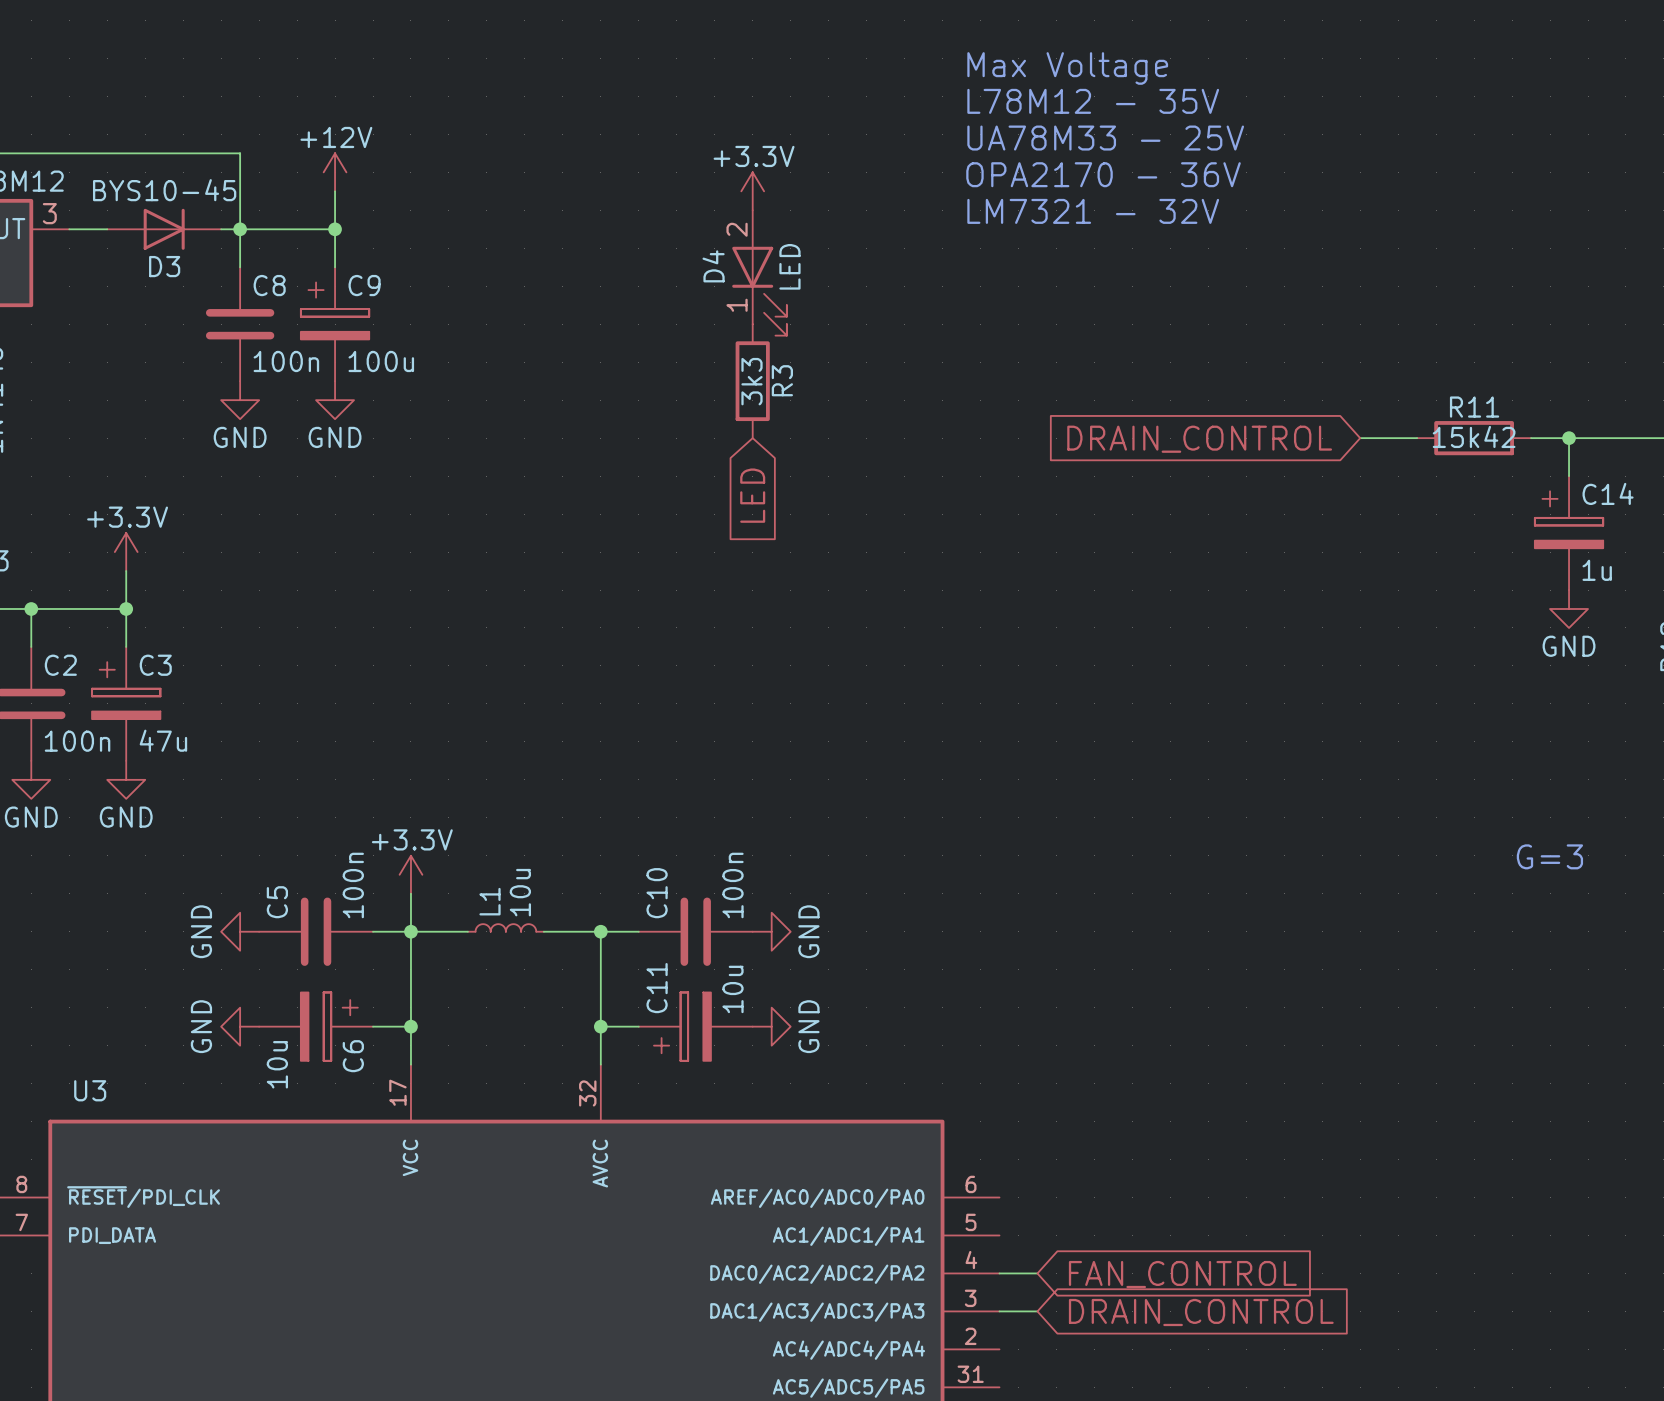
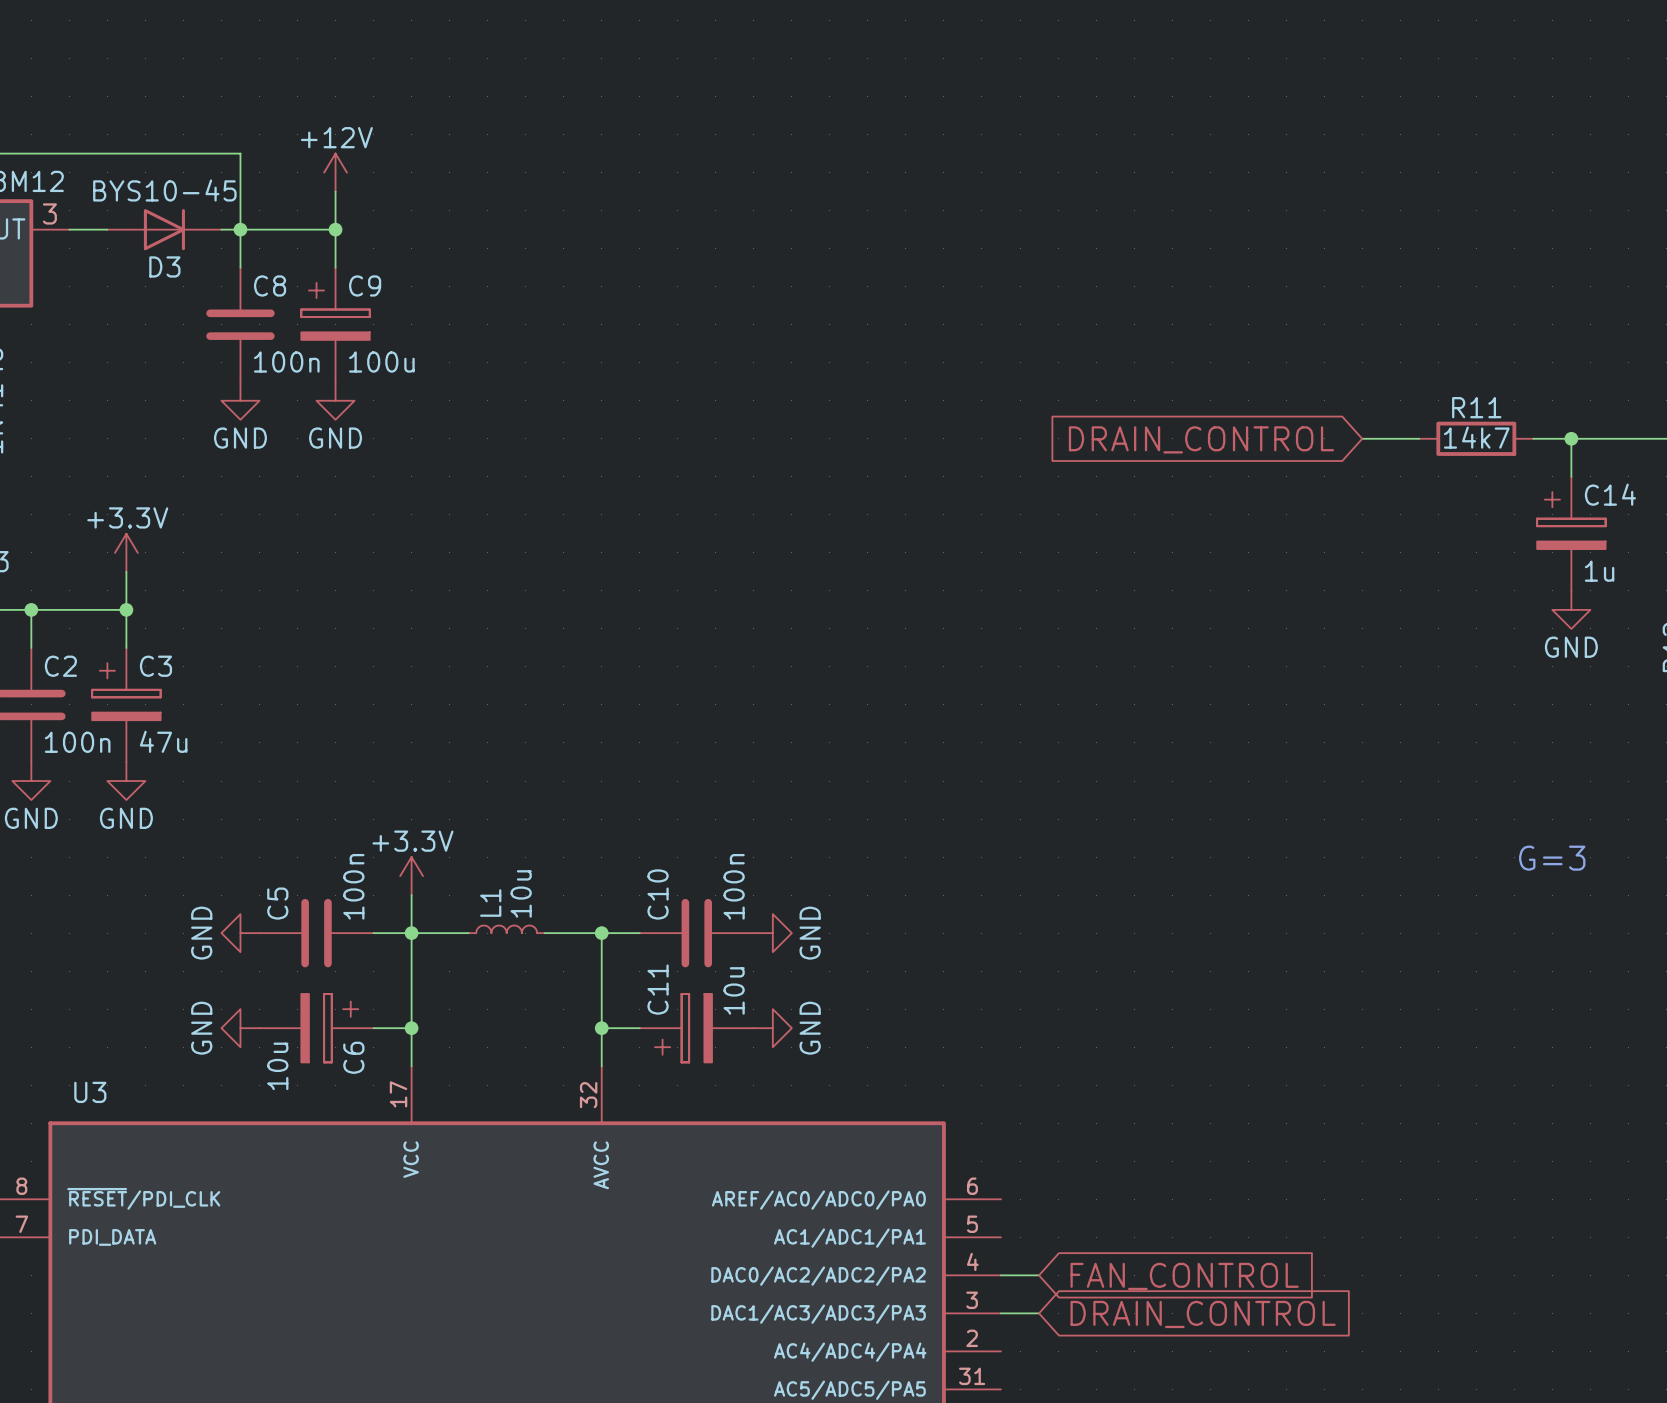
text: Max Voltage (1067, 68) -> none
text: L78M12 - 35V (1093, 101) -> none
text: UA78M33 - 25V (1105, 138) -> none
text: OPA2170 - 36V (1103, 174) -> none
power symbol: +3.3V (752, 191) -> none
text: LM7321 - 32V (1093, 211) -> none
D4: LED (759, 272) -> none
R3: 3k3 (752, 381) -> none
R11 value: 15k42 (1474, 436) -> 14k7 (1476, 437)
global label: LED (752, 495) -> none

